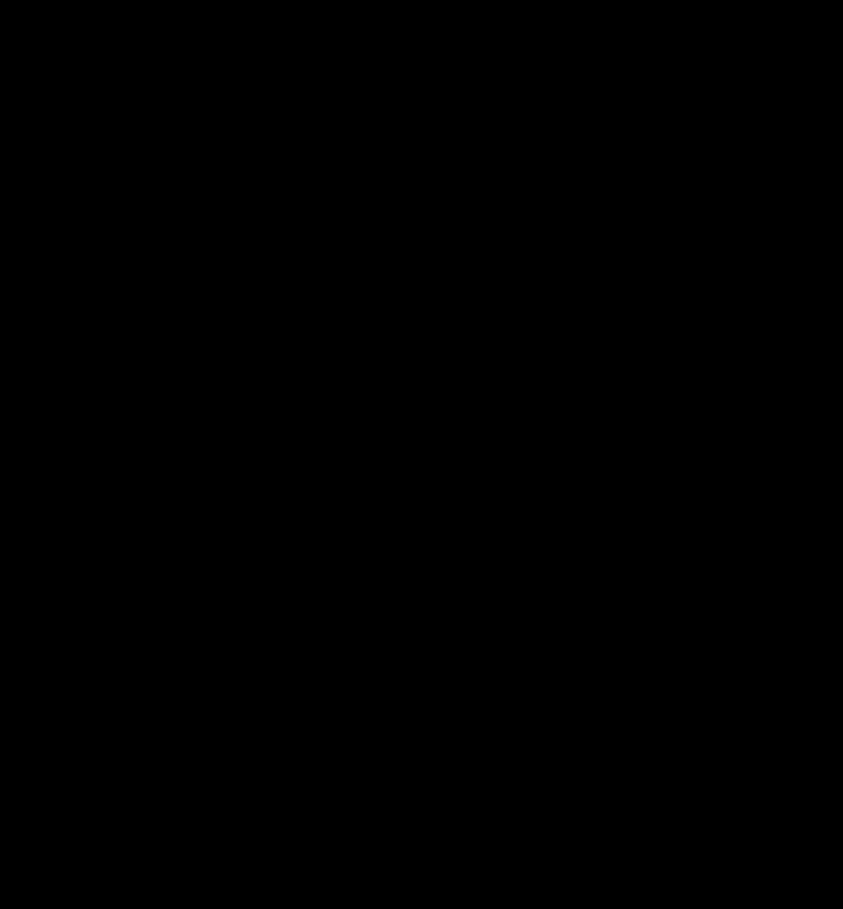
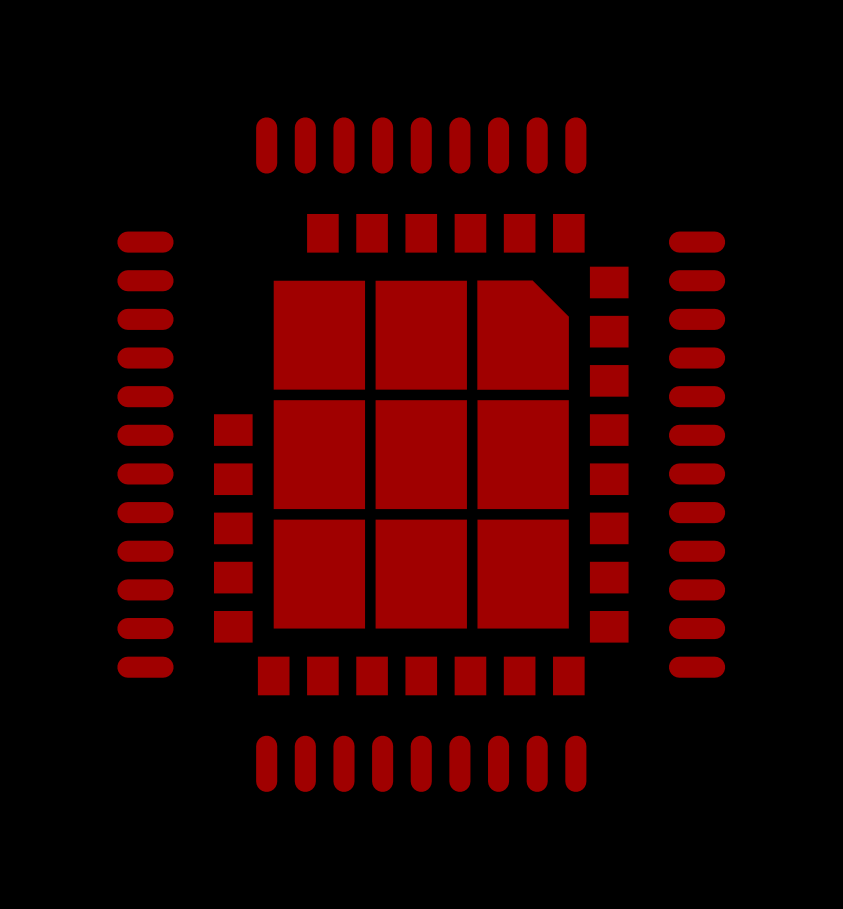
part: none -> (421, 454)

